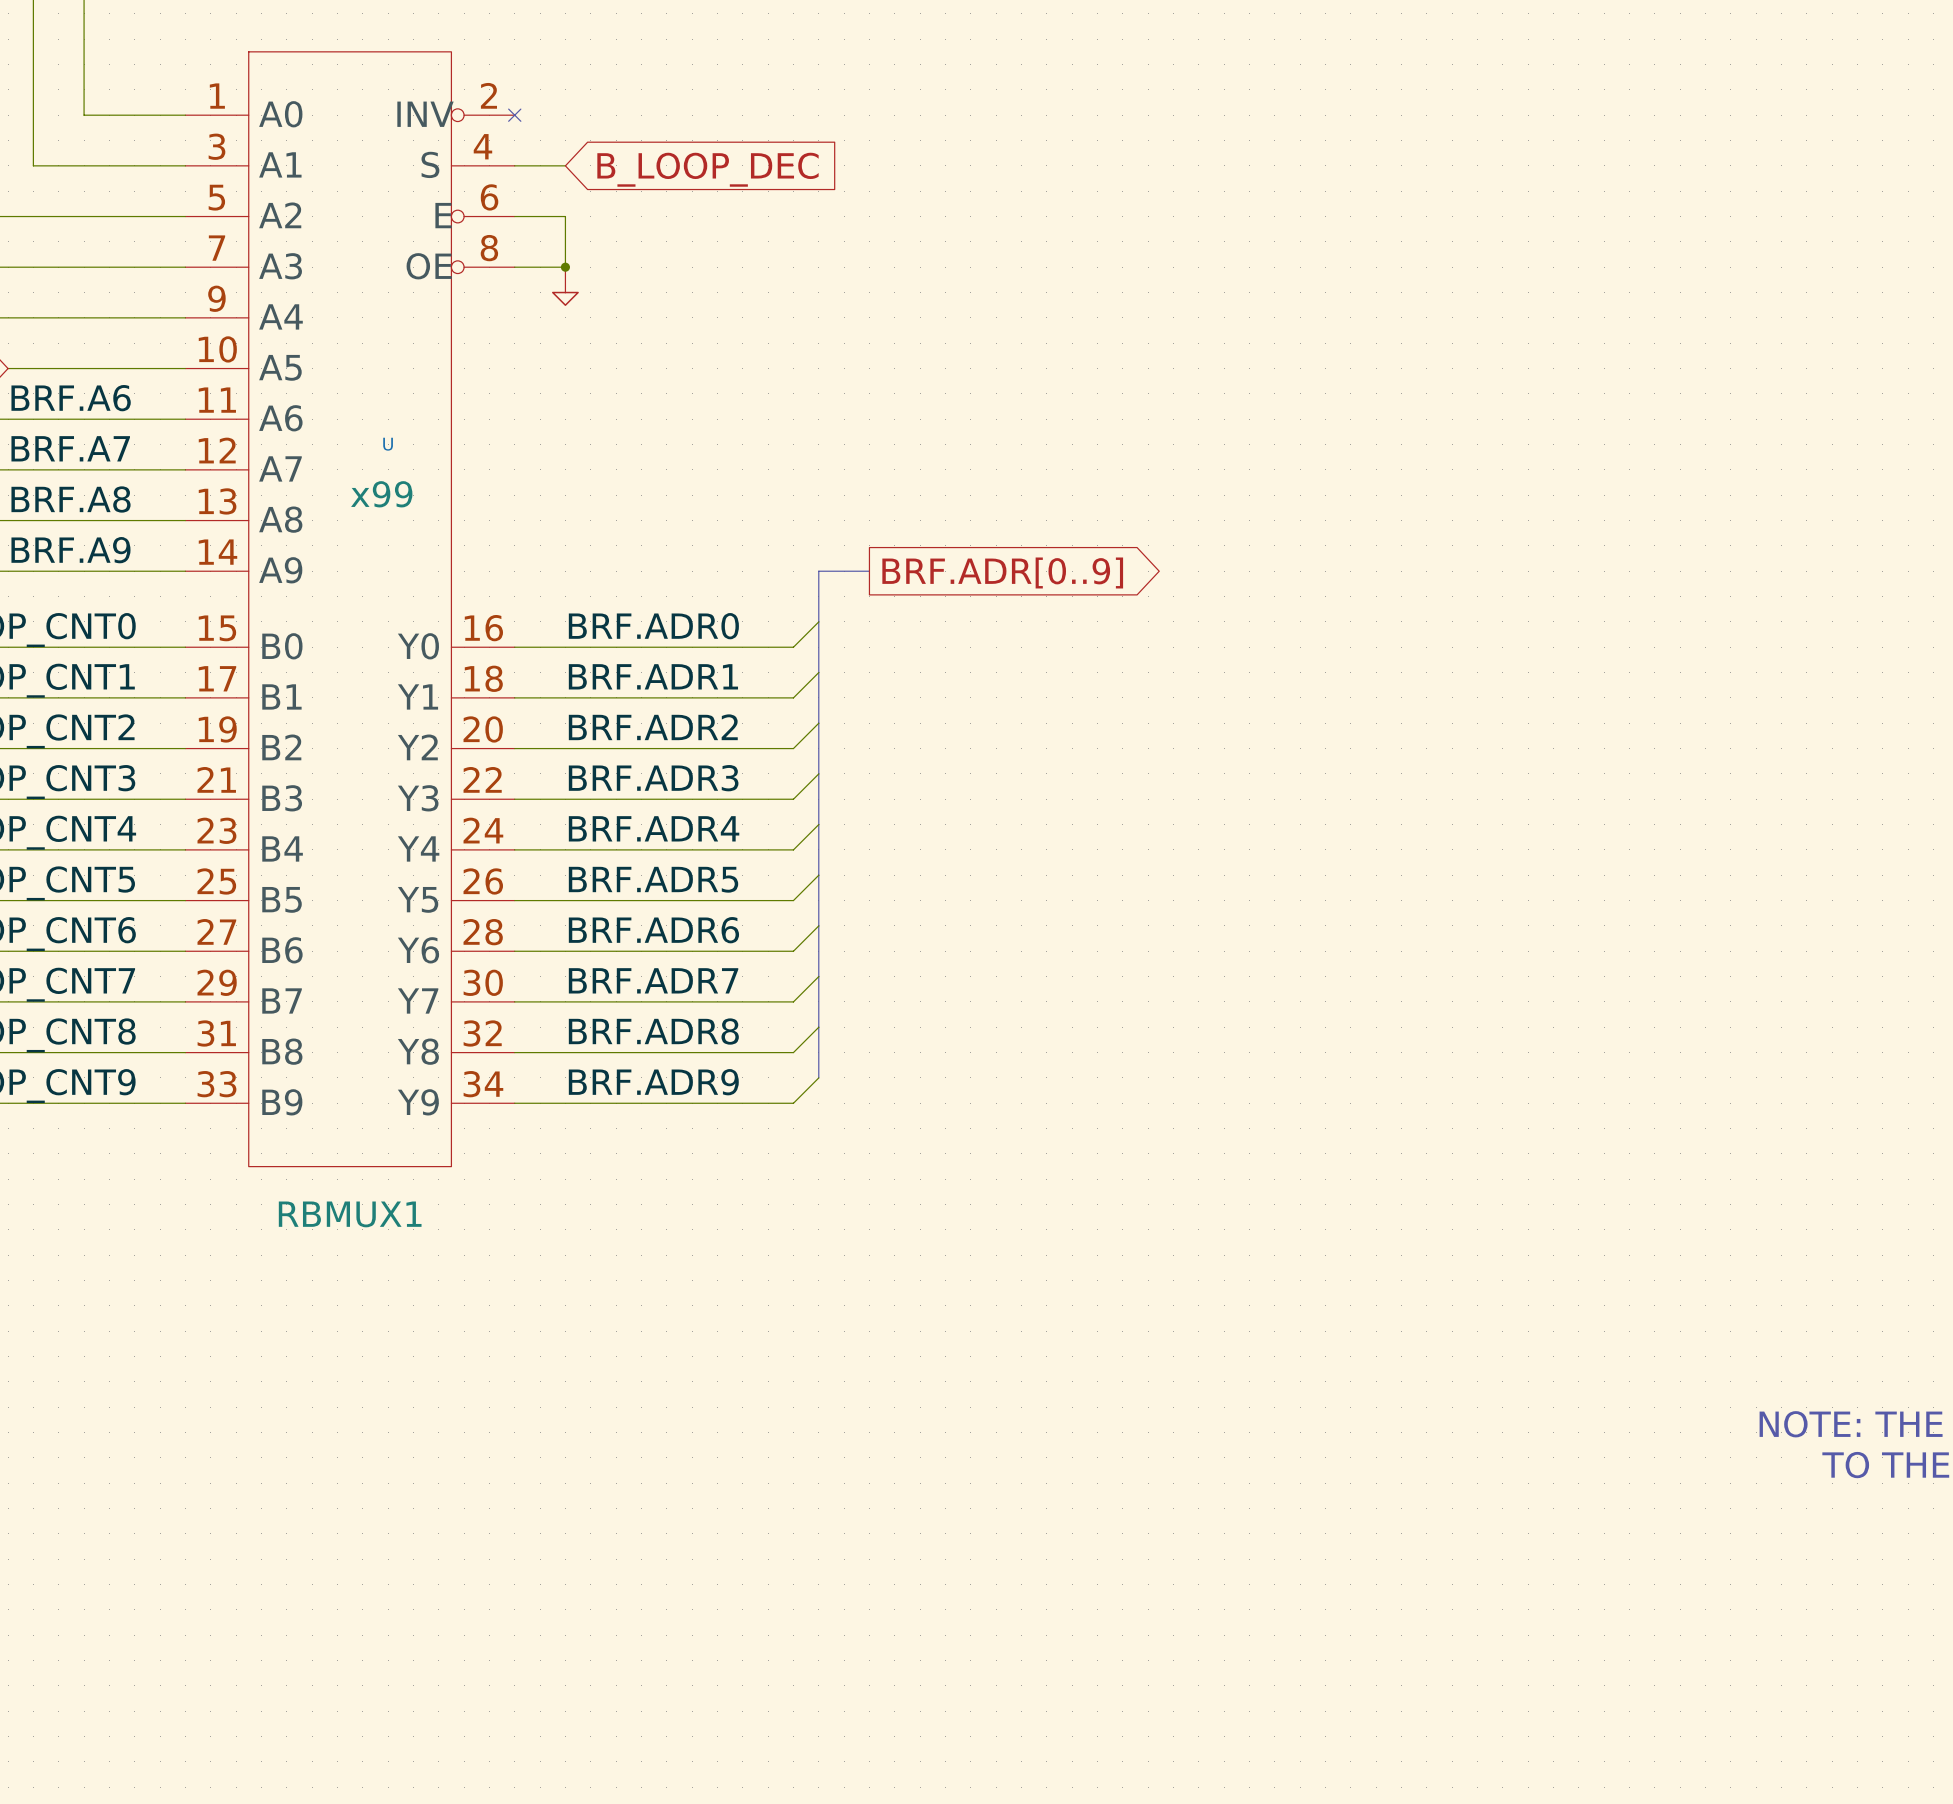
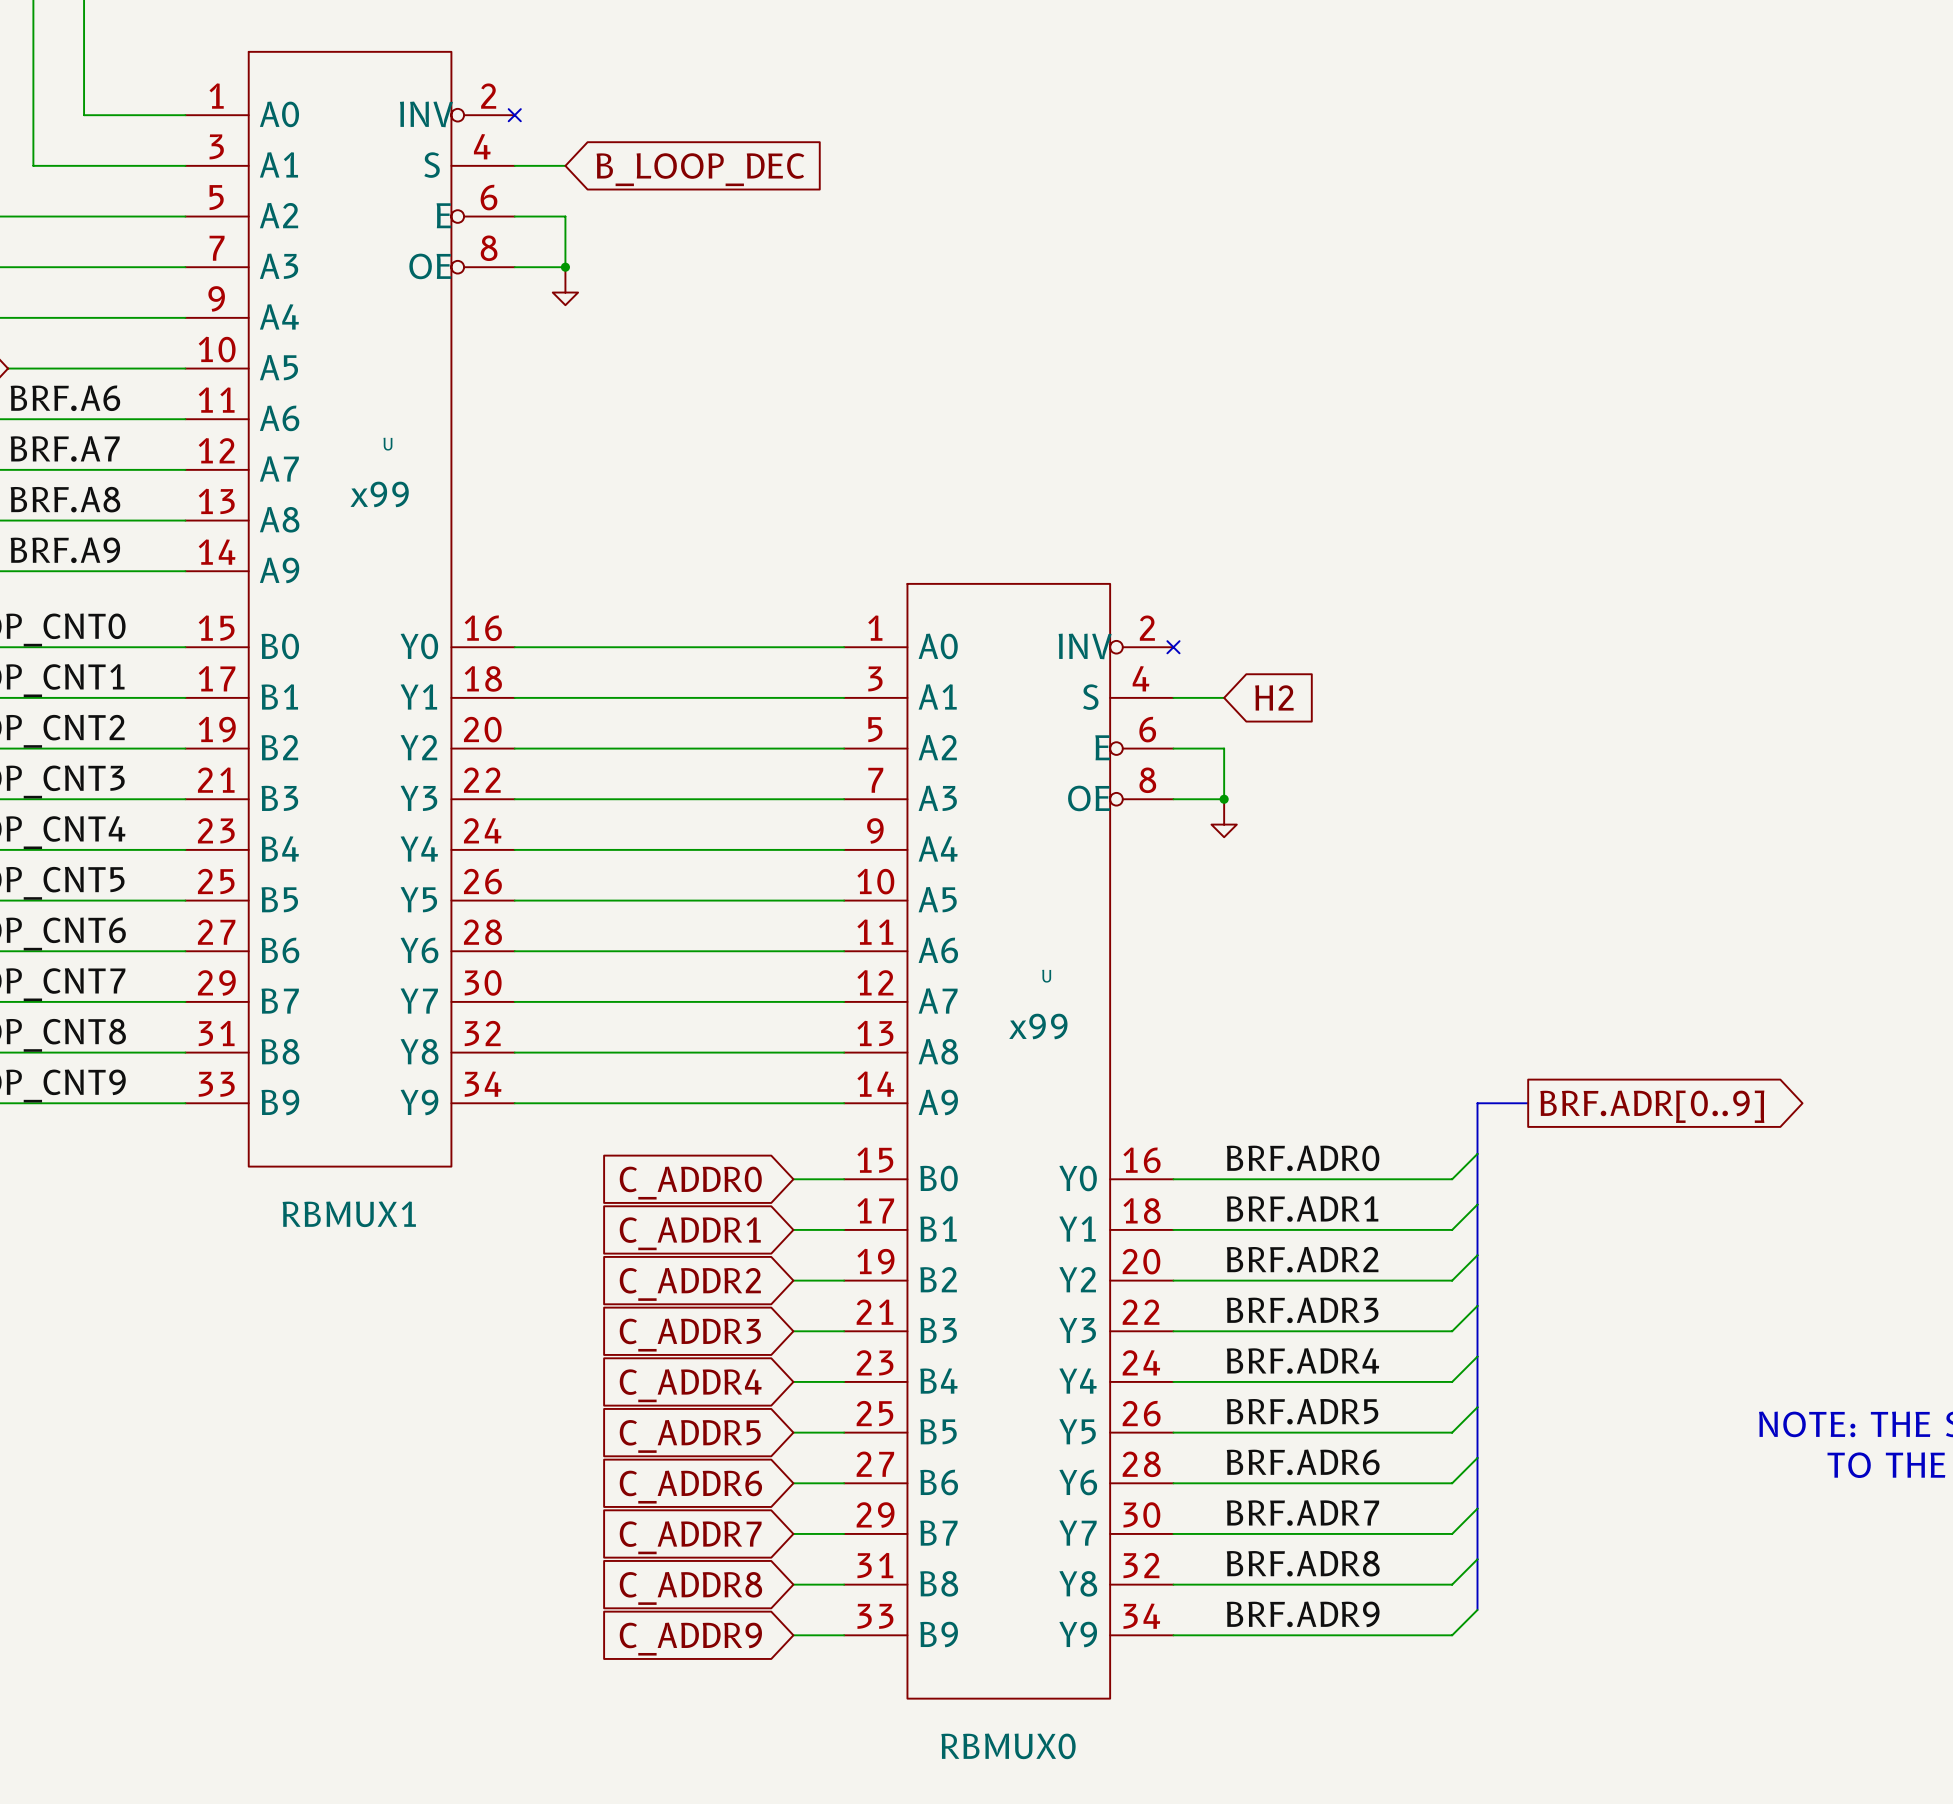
bus: (869, 571) (818, 571) (818, 1077) -> none
global label: BRF.ADR[0..9] (1002, 572) -> none
wire: (818, 621) (793, 647) -> (844, 647) (793, 647)
label: BRF.ADR0 (653, 626) -> none
no-connect mark: none -> (1173, 647)
wire: (818, 672) (793, 697) -> (844, 697) (793, 697)
label: BRF.ADR1 (653, 676) -> none
wire: none -> (1173, 697) (1224, 697)
global label: none -> H2 (1274, 697)
wire: (818, 723) (793, 748) -> (844, 748) (793, 748)
label: BRF.ADR2 (653, 727) -> none
wire: none -> (1173, 748) (1224, 748) (1224, 799) (1173, 799)
wire: (818, 773) (793, 799) -> (844, 799) (793, 799)
label: BRF.ADR3 (653, 778) -> none
junction: none -> (1224, 799)
power symbol: none -> (1224, 818)
wire: (818, 824) (793, 849) -> (844, 849) (793, 849)
label: BRF.ADR4 (654, 828) -> none
wire: (818, 875) (793, 900) -> (844, 900) (793, 900)
label: BRF.ADR5 (653, 879) -> none
wire: (818, 925) (793, 951) -> (844, 951) (793, 951)
label: BRF.ADR6 (653, 930) -> none
wire: (818, 976) (793, 1001) -> (844, 1001) (793, 1001)
label: BRF.ADR7 (653, 980) -> none
wire: (818, 1027) (793, 1052) -> (844, 1052) (793, 1052)
label: BRF.ADR8 (653, 1031) -> none
wire: (818, 1077) (793, 1103) -> (844, 1103) (793, 1103)
label: BRF.ADR9 (653, 1082) -> none
bus: none -> (1528, 1103) (1477, 1103) (1477, 1609)
global label: none -> BRF.ADR[0..9] (1652, 1106)
U: none -> (1008, 1141)
wire: none -> (1477, 1153) (1452, 1179) (1173, 1179)
label: none -> BRF.ADR0 (1303, 1158)
wire: none -> (793, 1179) (844, 1179)
global label: none -> C_ADDR0 (690, 1183)
wire: none -> (1477, 1204) (1452, 1229) (1173, 1229)
label: none -> BRF.ADR1 (1302, 1208)
wire: none -> (793, 1229) (844, 1229)
global label: none -> C_ADDR1 (690, 1233)
wire: none -> (1477, 1255) (1452, 1280) (1173, 1280)
label: none -> BRF.ADR2 (1302, 1259)
wire: none -> (793, 1280) (844, 1280)
global label: none -> C_ADDR2 (690, 1284)
wire: none -> (1477, 1305) (1452, 1331) (1173, 1331)
label: none -> BRF.ADR3 (1302, 1310)
wire: none -> (793, 1331) (844, 1331)
global label: none -> C_ADDR3 (690, 1335)
wire: none -> (1477, 1356) (1452, 1381) (1173, 1381)
label: none -> BRF.ADR4 (1302, 1361)
wire: none -> (793, 1381) (844, 1381)
global label: none -> C_ADDR4 (690, 1385)
wire: none -> (1477, 1407) (1452, 1432) (1173, 1432)
label: none -> BRF.ADR5 (1302, 1411)
wire: none -> (793, 1432) (844, 1432)
global label: none -> C_ADDR5 (690, 1436)
wire: none -> (1477, 1457) (1452, 1483) (1173, 1483)
label: none -> BRF.ADR6 (1303, 1462)
wire: none -> (793, 1483) (844, 1483)
global label: none -> C_ADDR6 (690, 1487)
wire: none -> (1477, 1508) (1452, 1533) (1173, 1533)
label: none -> BRF.ADR7 (1302, 1513)
wire: none -> (793, 1533) (844, 1533)
global label: none -> C_ADDR7 (690, 1537)
wire: none -> (1477, 1559) (1452, 1584) (1173, 1584)
label: none -> BRF.ADR8 (1303, 1563)
wire: none -> (793, 1584) (844, 1584)
global label: none -> C_ADDR8 (690, 1588)
wire: none -> (1477, 1609) (1452, 1635) (1173, 1635)
label: none -> BRF.ADR9 (1303, 1614)
wire: none -> (793, 1635) (844, 1635)
global label: none -> C_ADDR9 (690, 1639)

